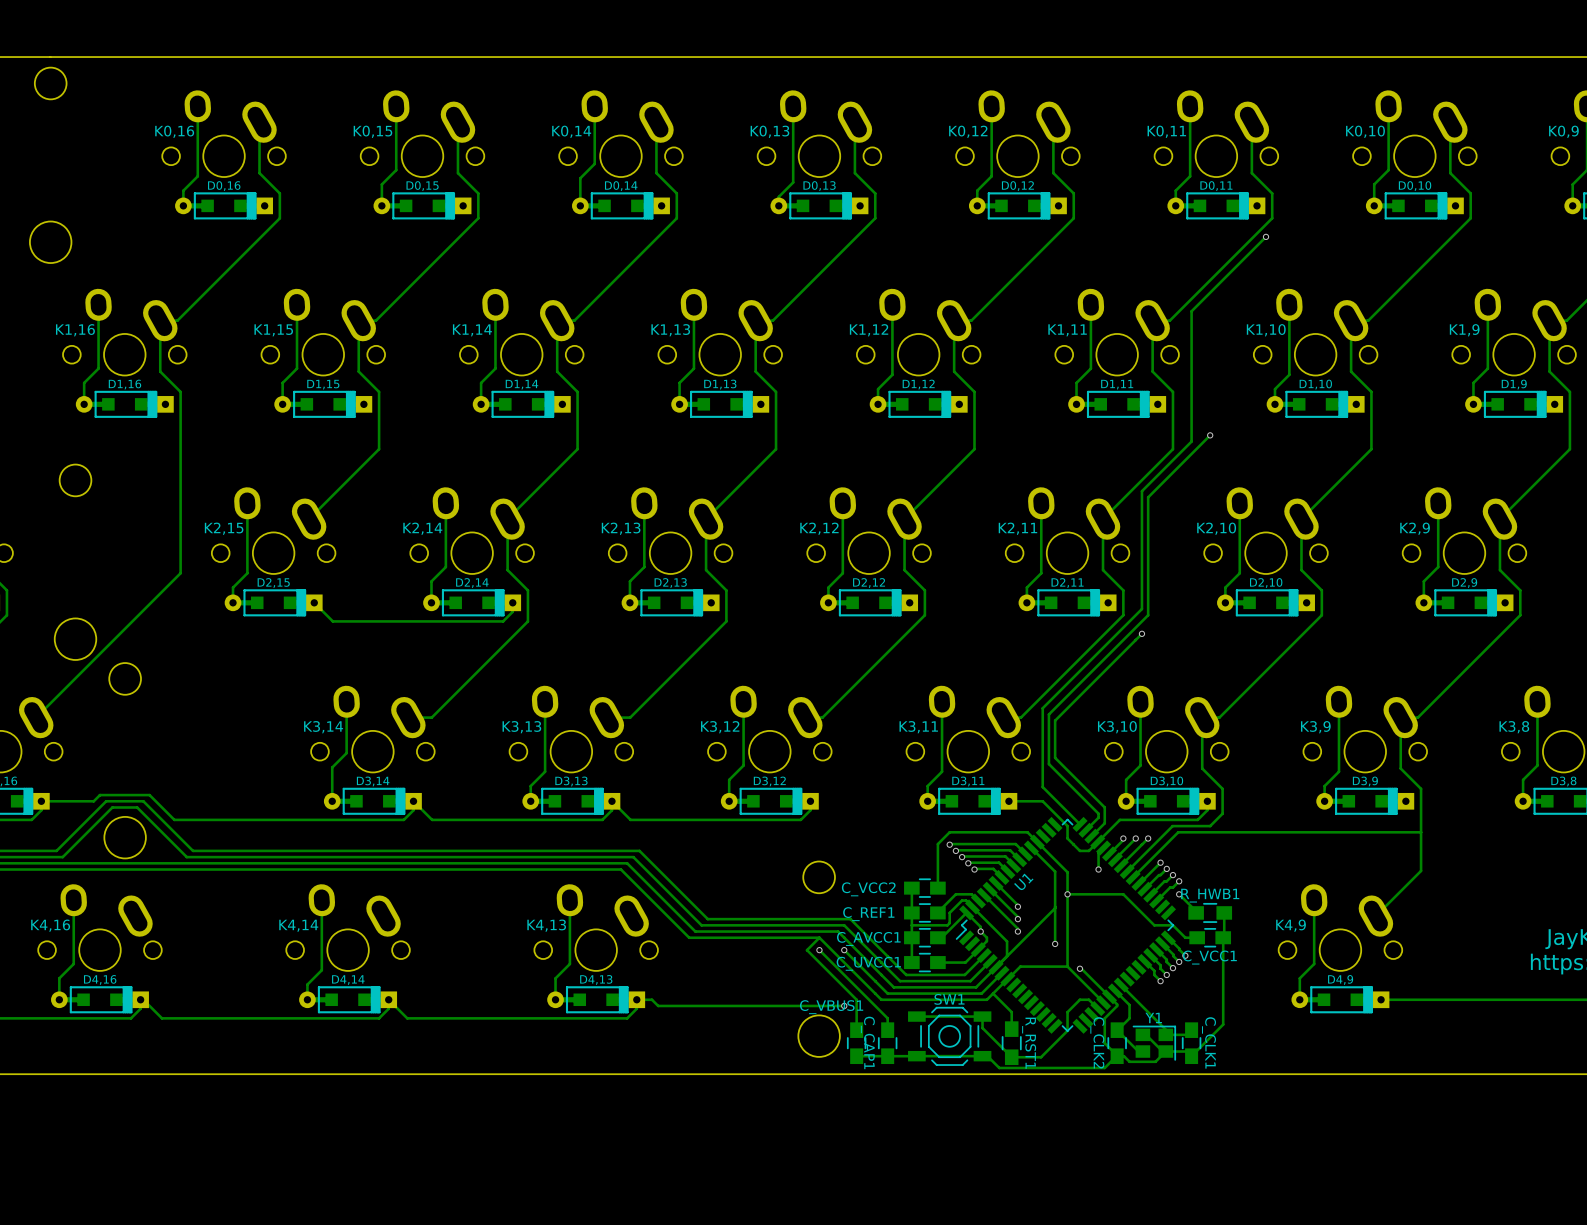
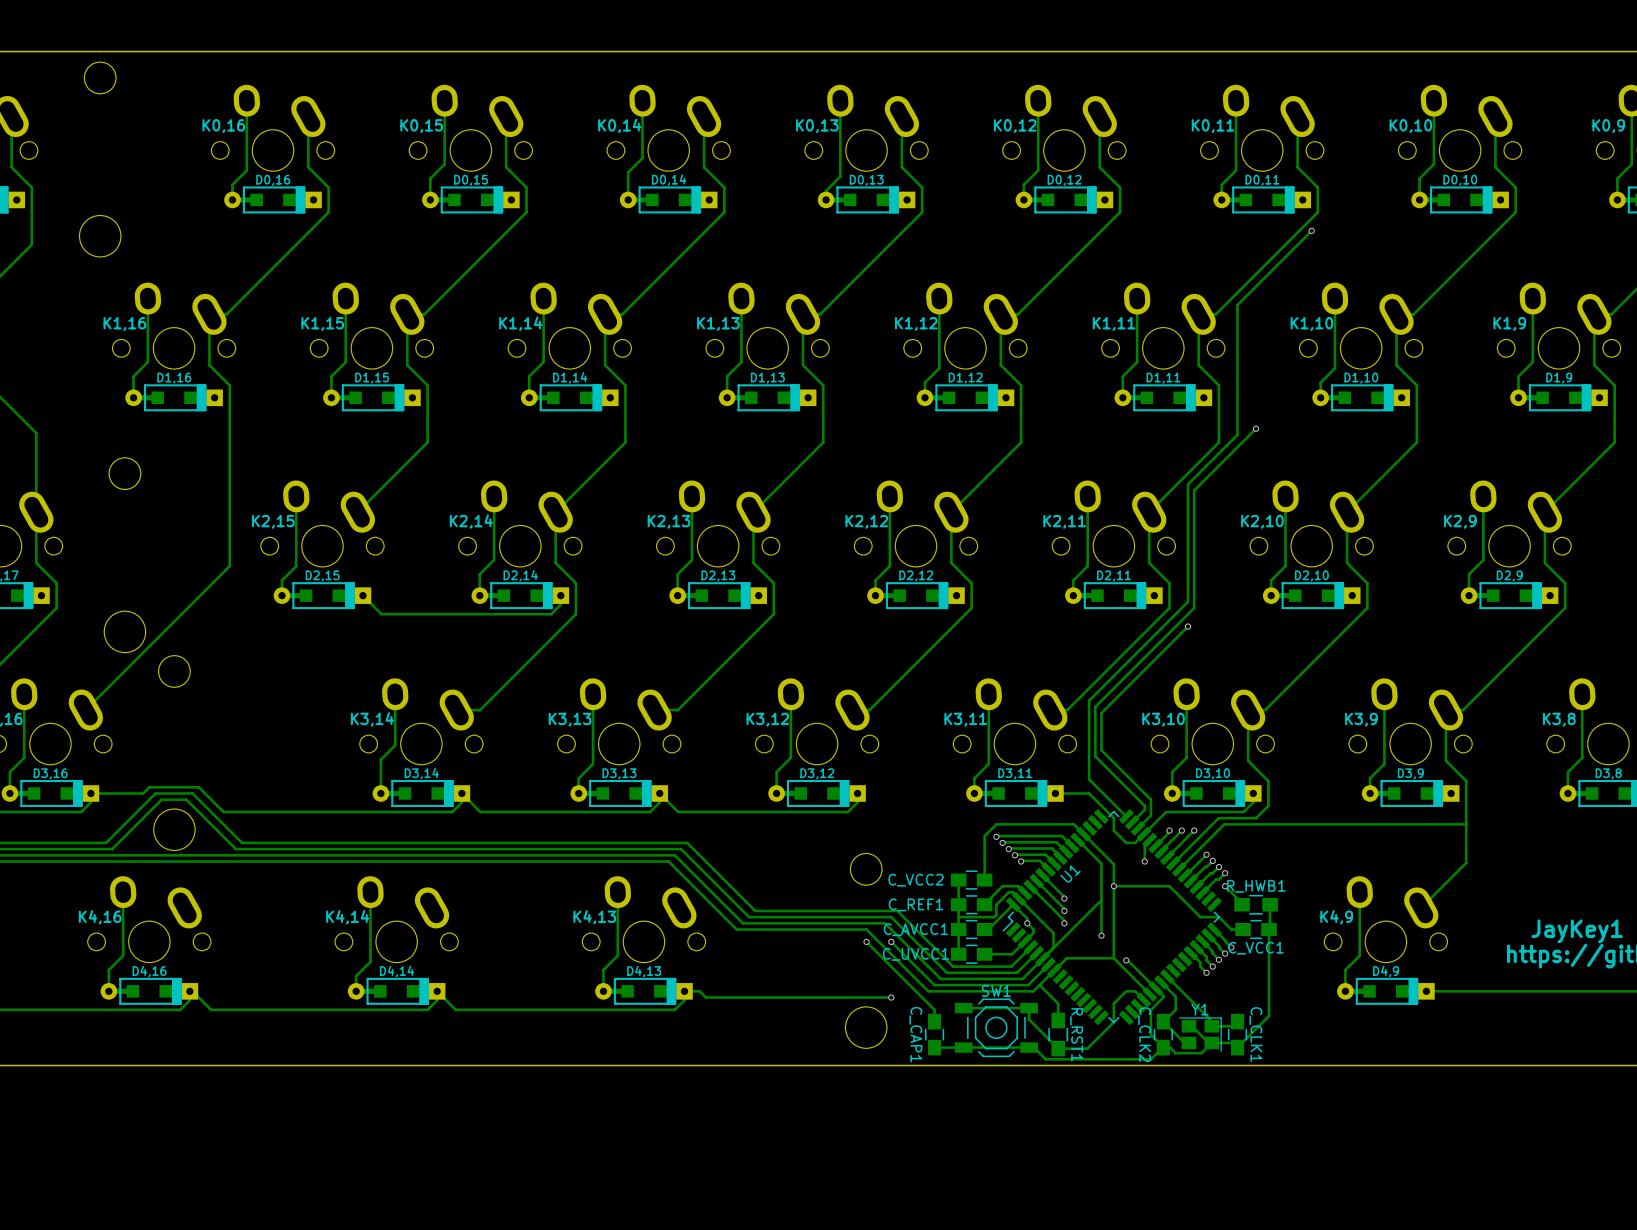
track: (819, 937) (807, 950) (856, 999) (856, 1030) -> none
C_VBUS1: (856, 1043) -> none
track: (887, 1056) (856, 1056) -> none

